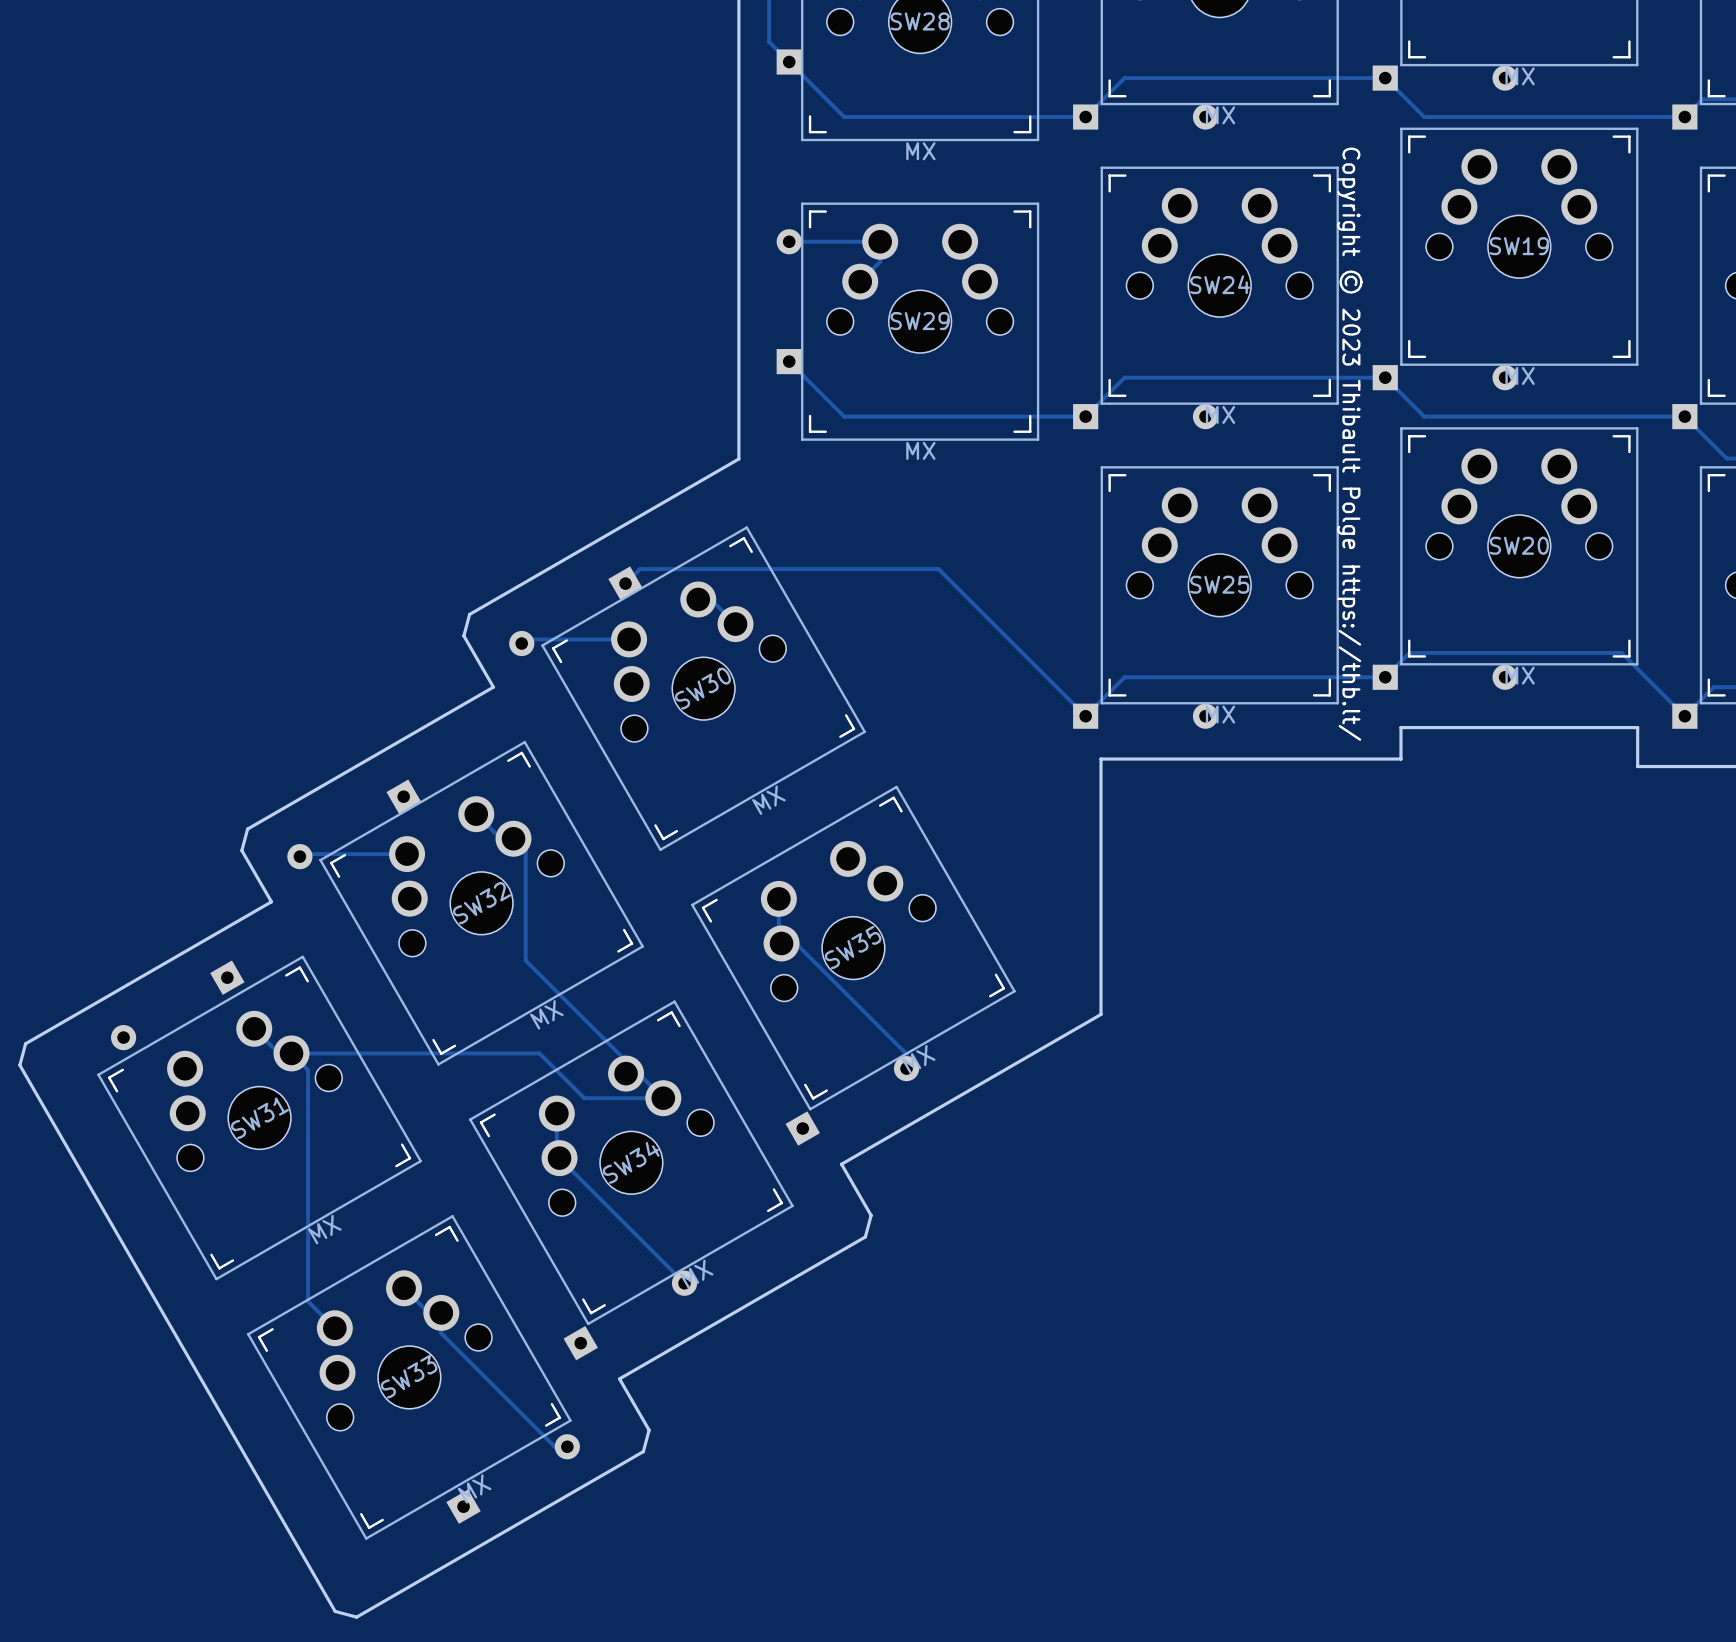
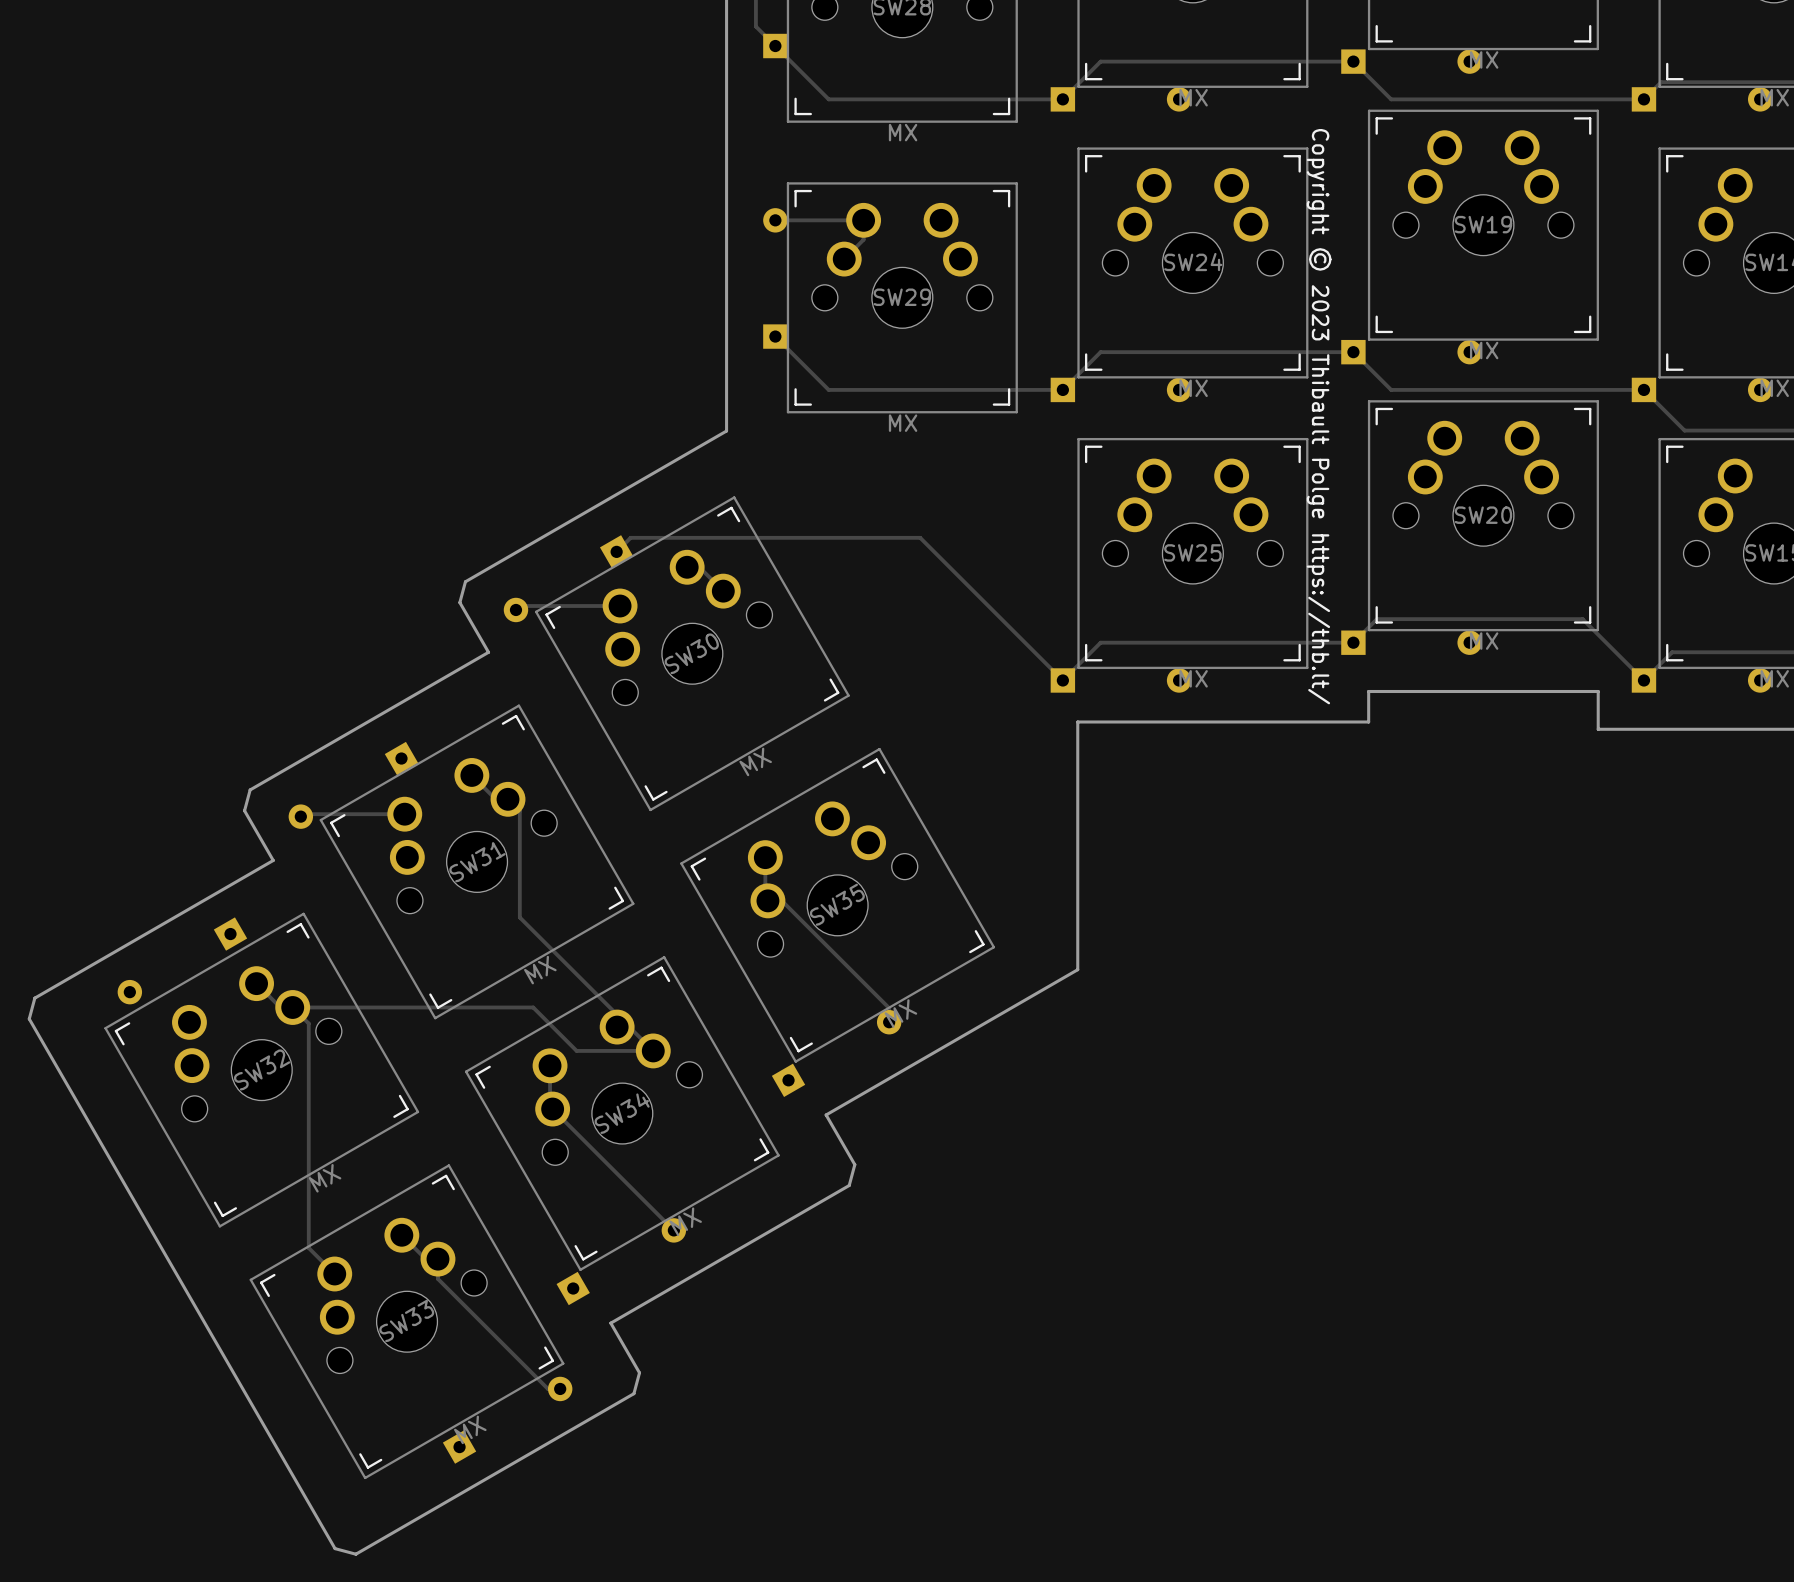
SW32 name: SW32 (482, 903) -> SW31 (477, 862)
SW31 name: SW31 (260, 1118) -> SW32 (262, 1069)

